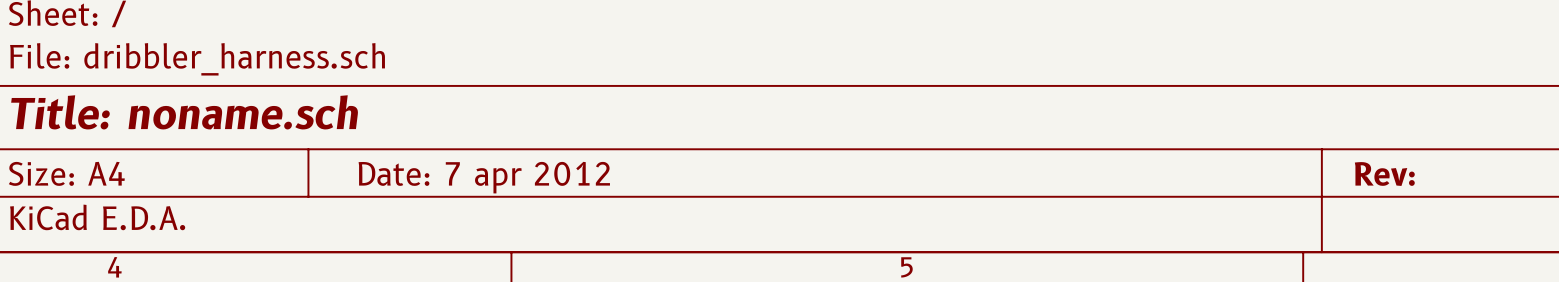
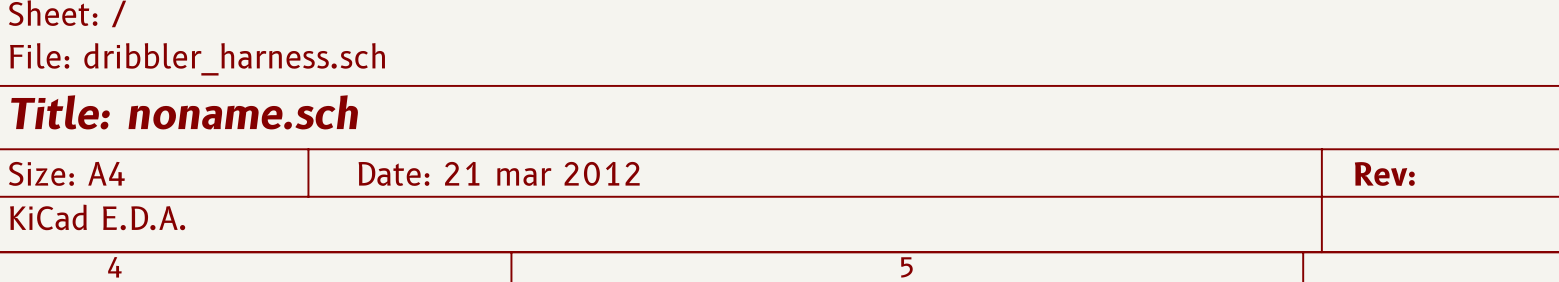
title block: Date: 7 apr 2012 (484, 177) -> Date: 21 mar 2012 (499, 173)

